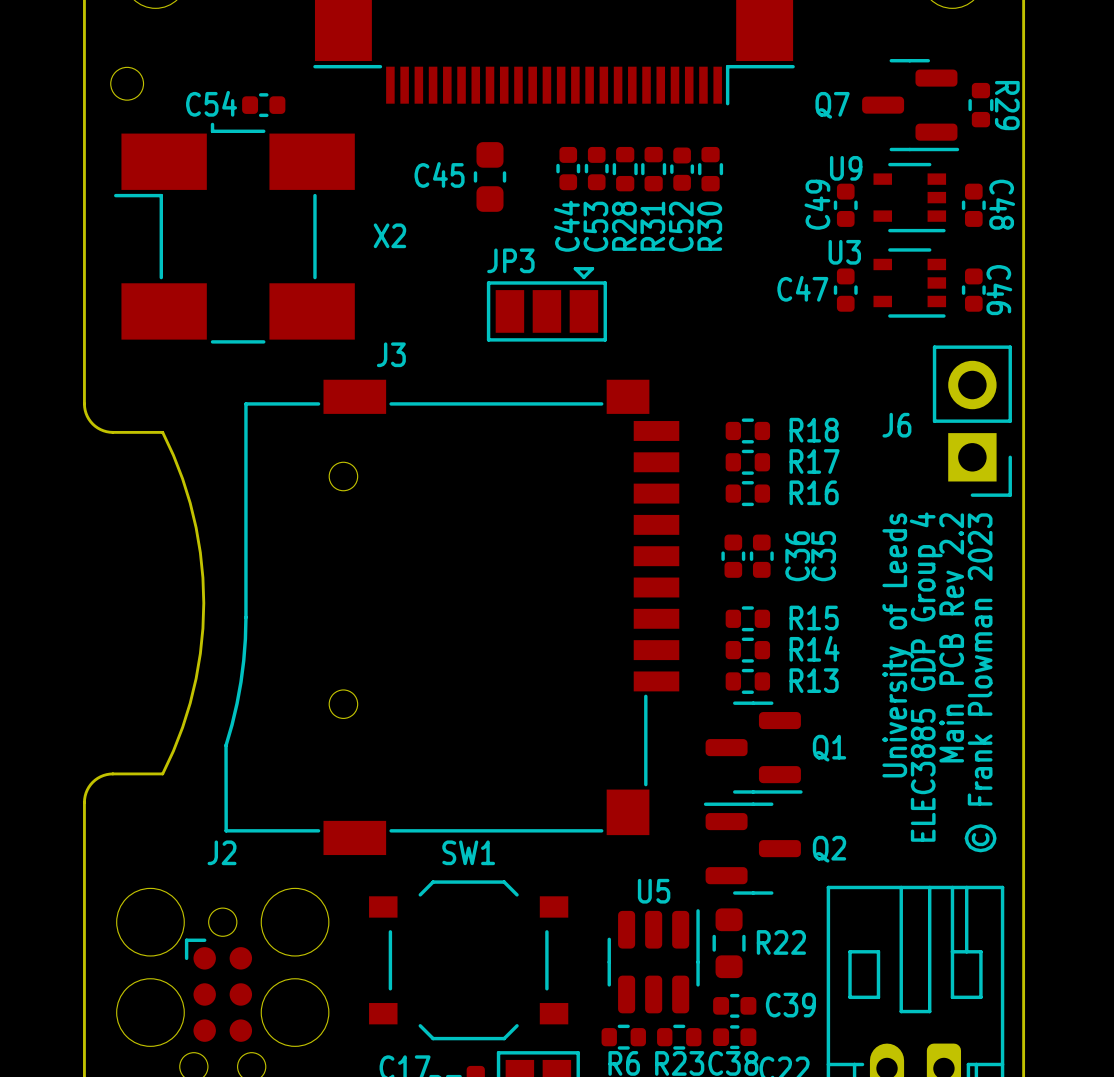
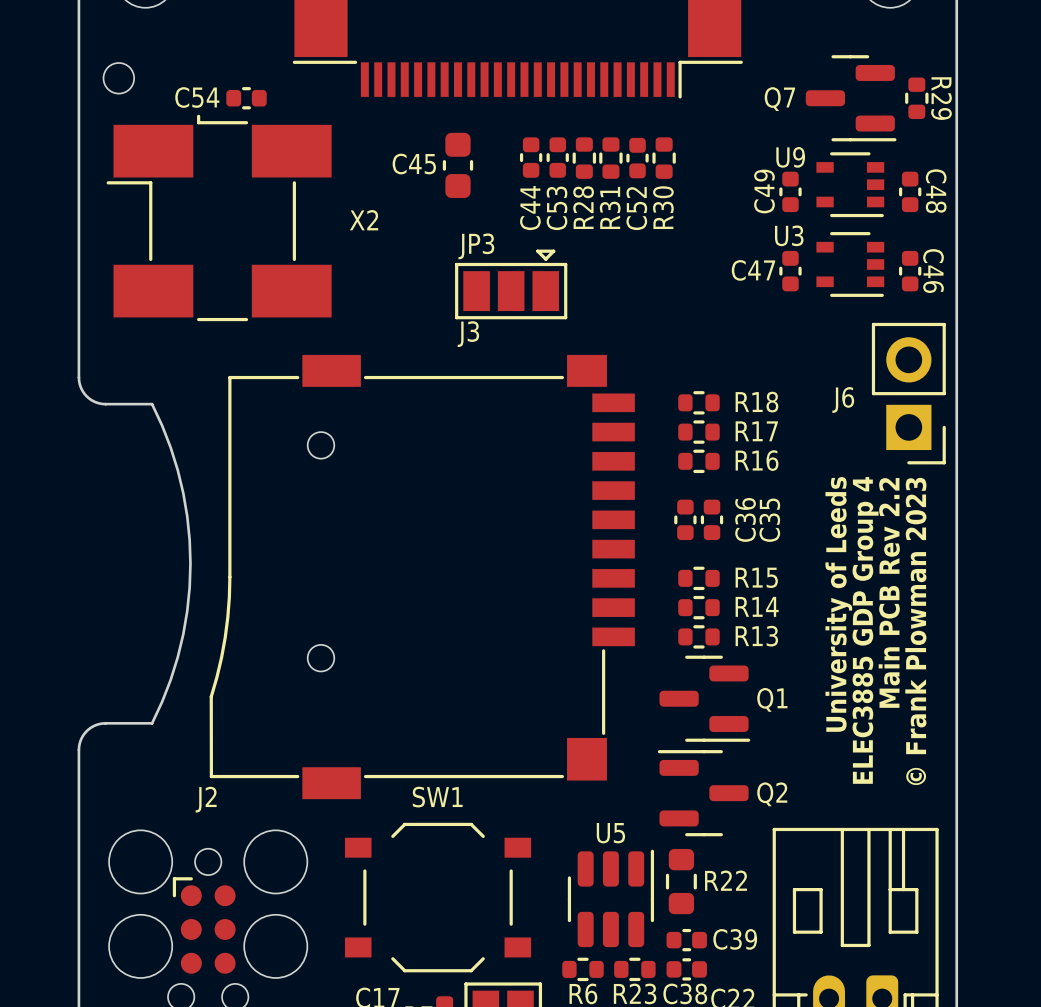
J3 name position: J3 (391, 354) -> J3 (468, 334)

